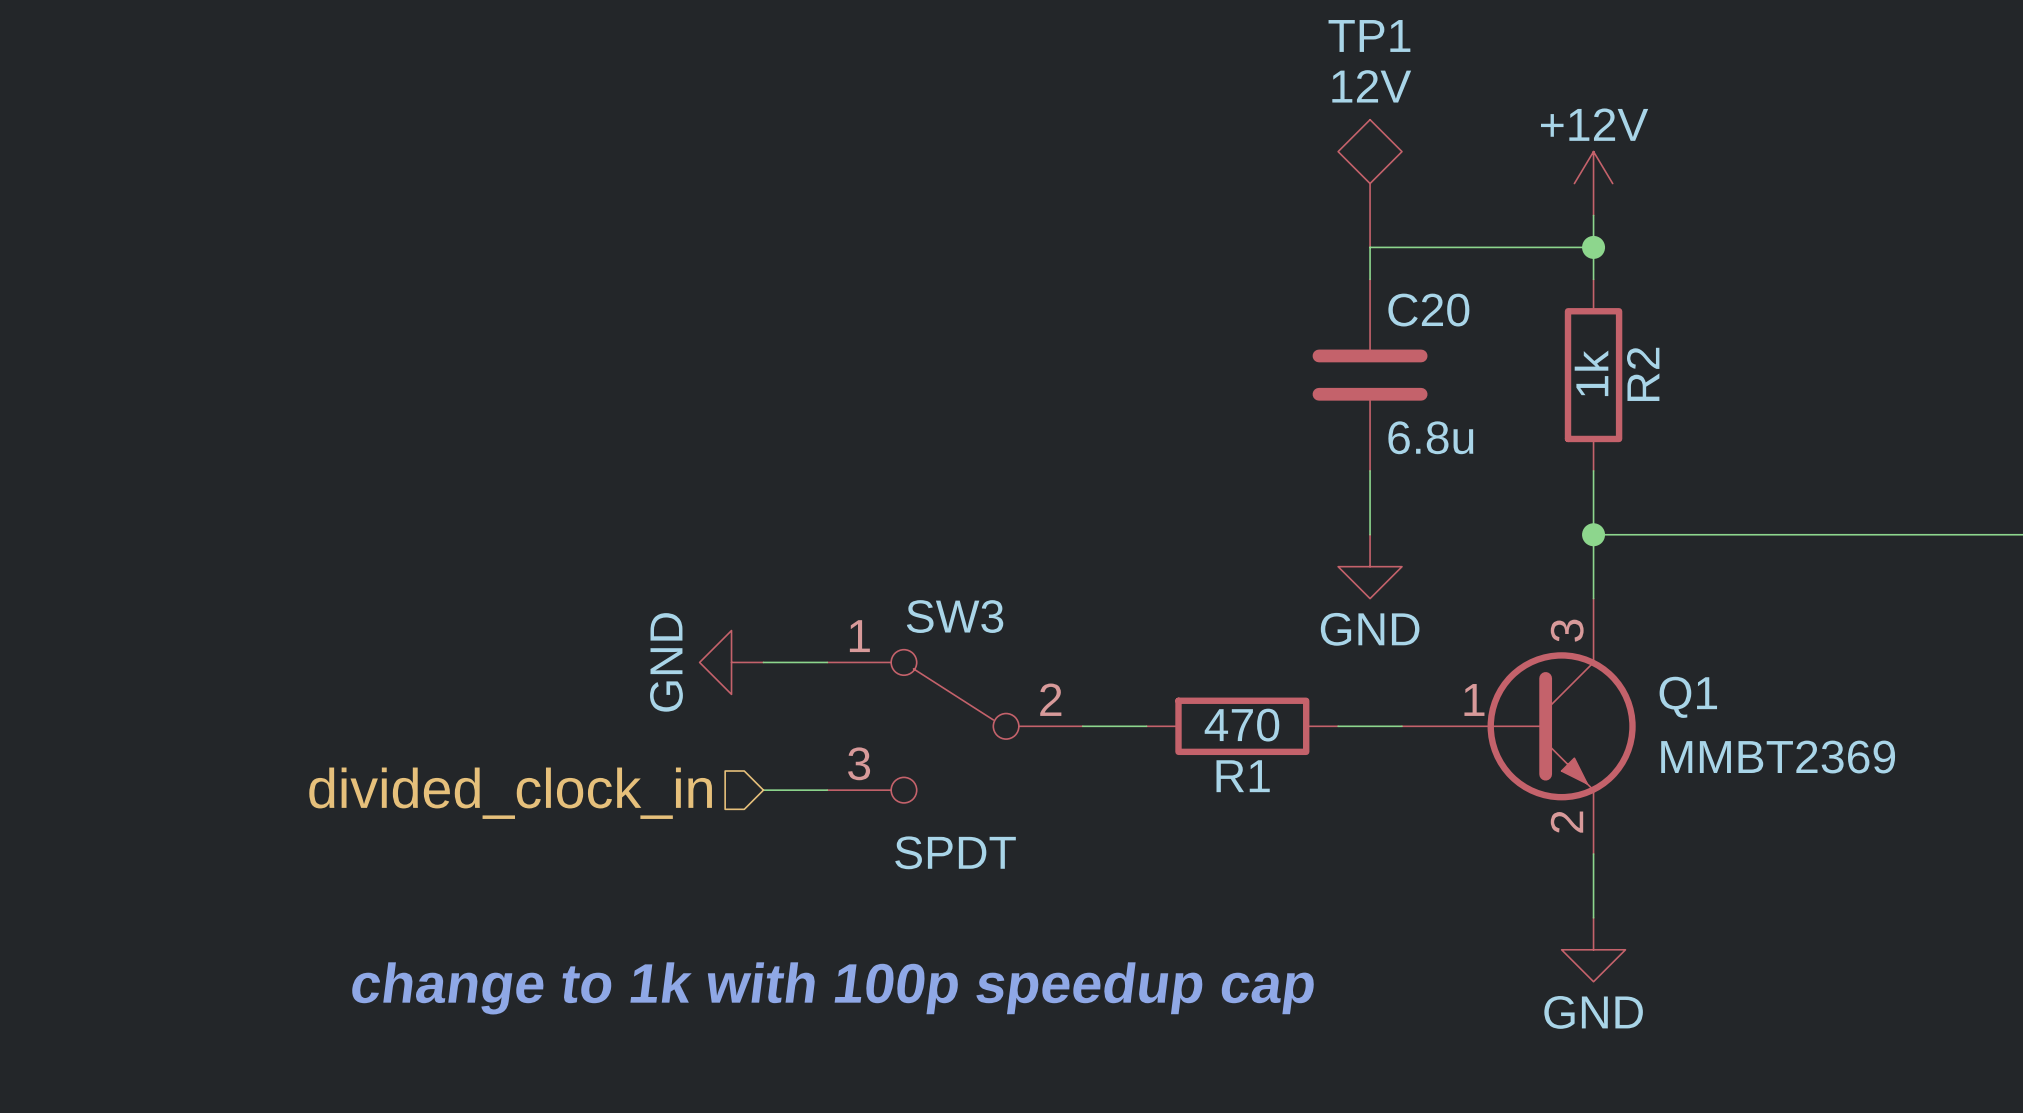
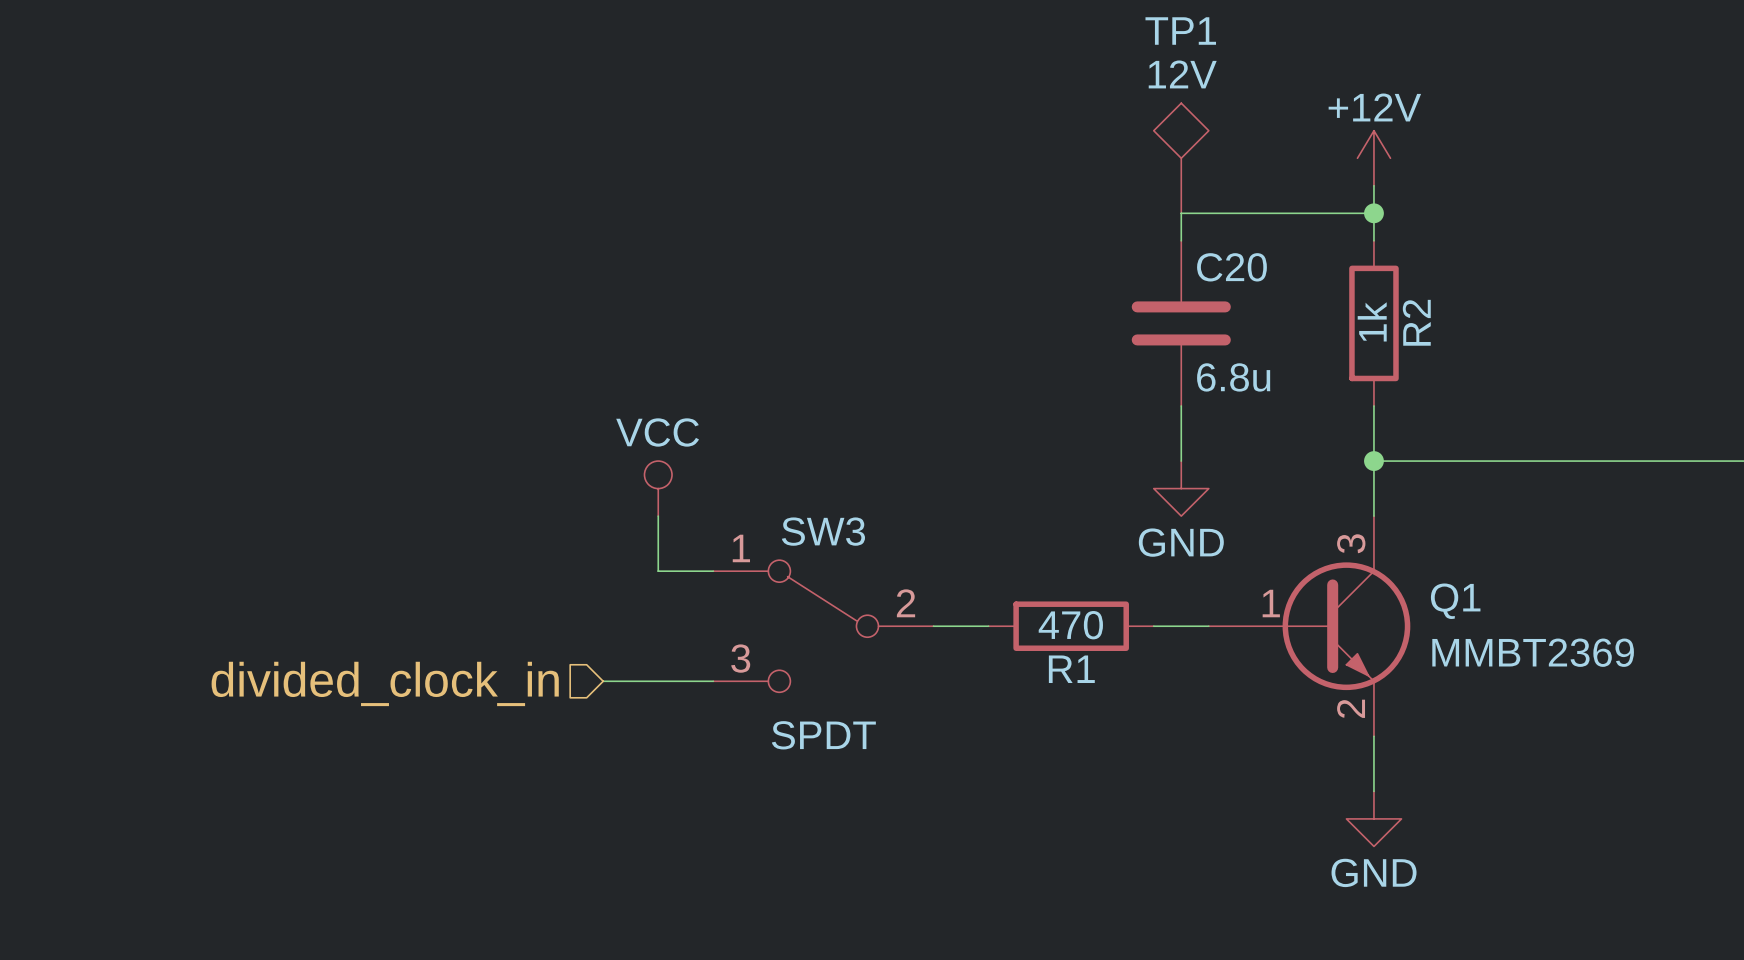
power symbol: none -> VCC (658, 488)
wire: none -> (658, 516) (658, 571)
power symbol: GND (731, 662) -> none
wire: none -> (603, 681) (658, 681)
hierarchical label position: divided_clock_in (510, 793) -> divided_clock_in (385, 683)
text: change to 1k with 100p speedup cap (832, 988) -> none

